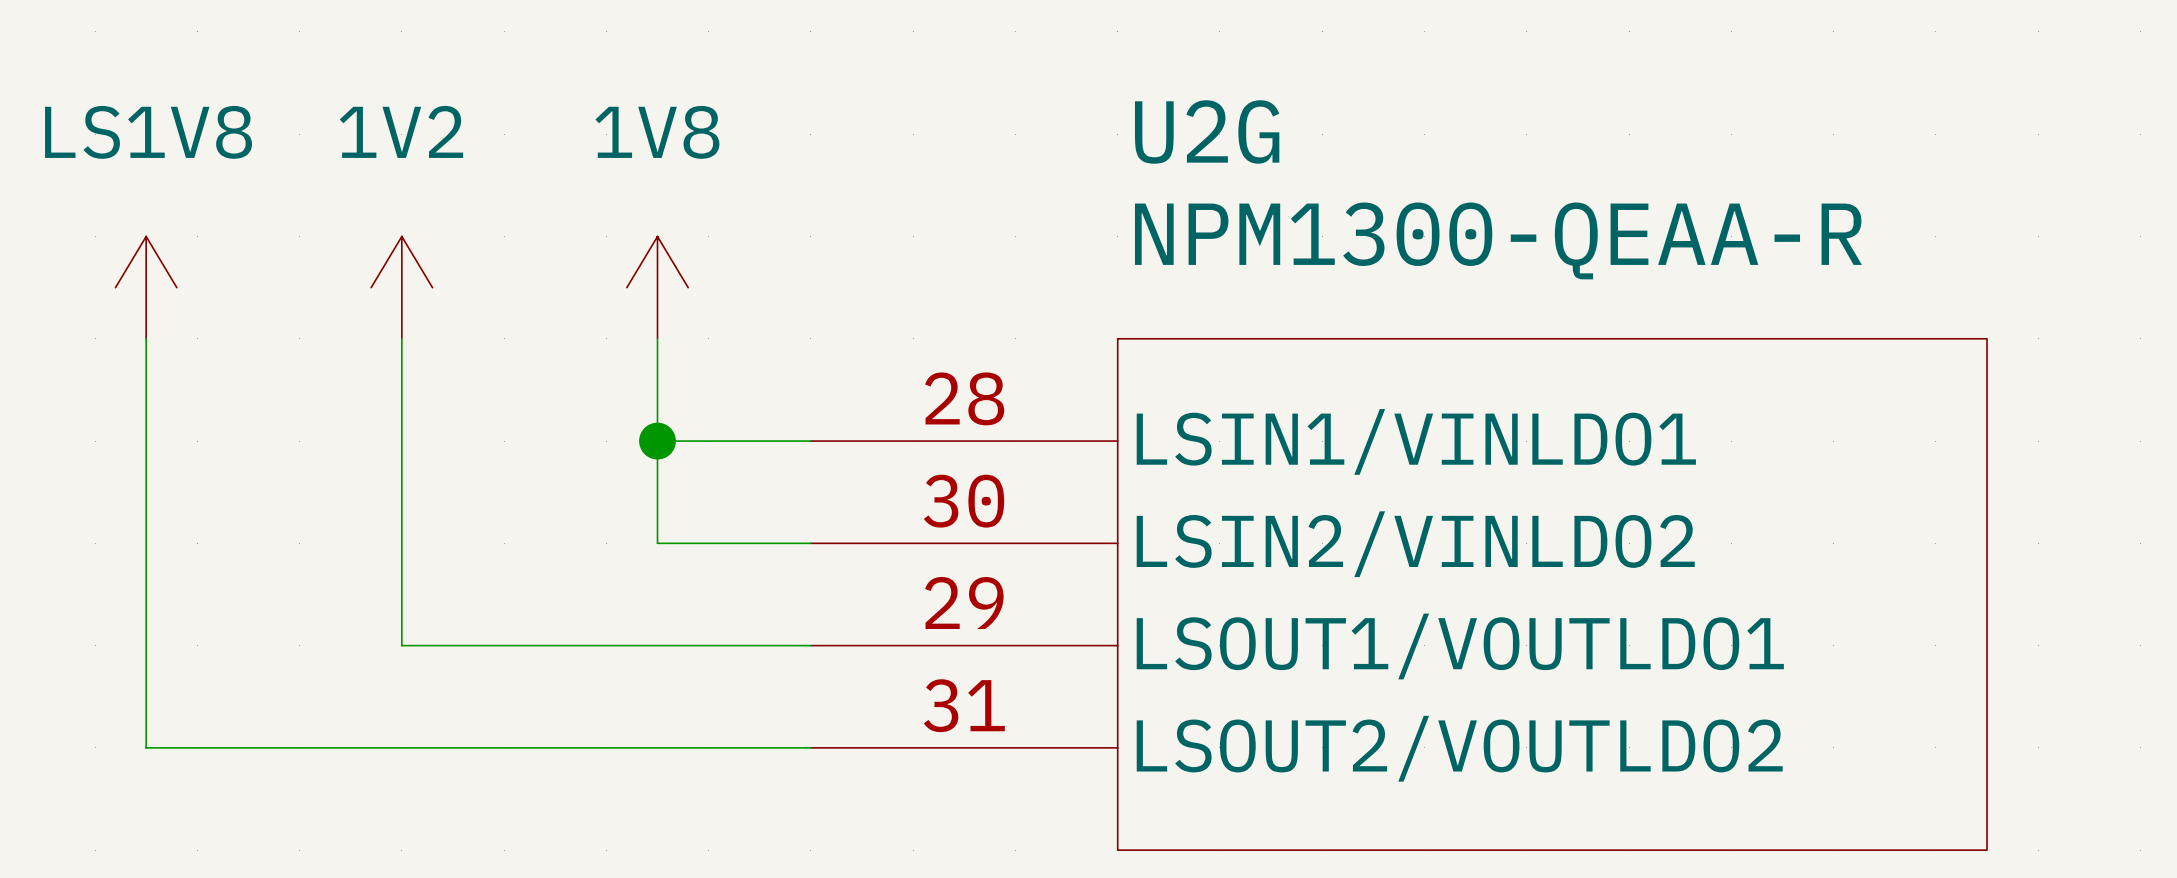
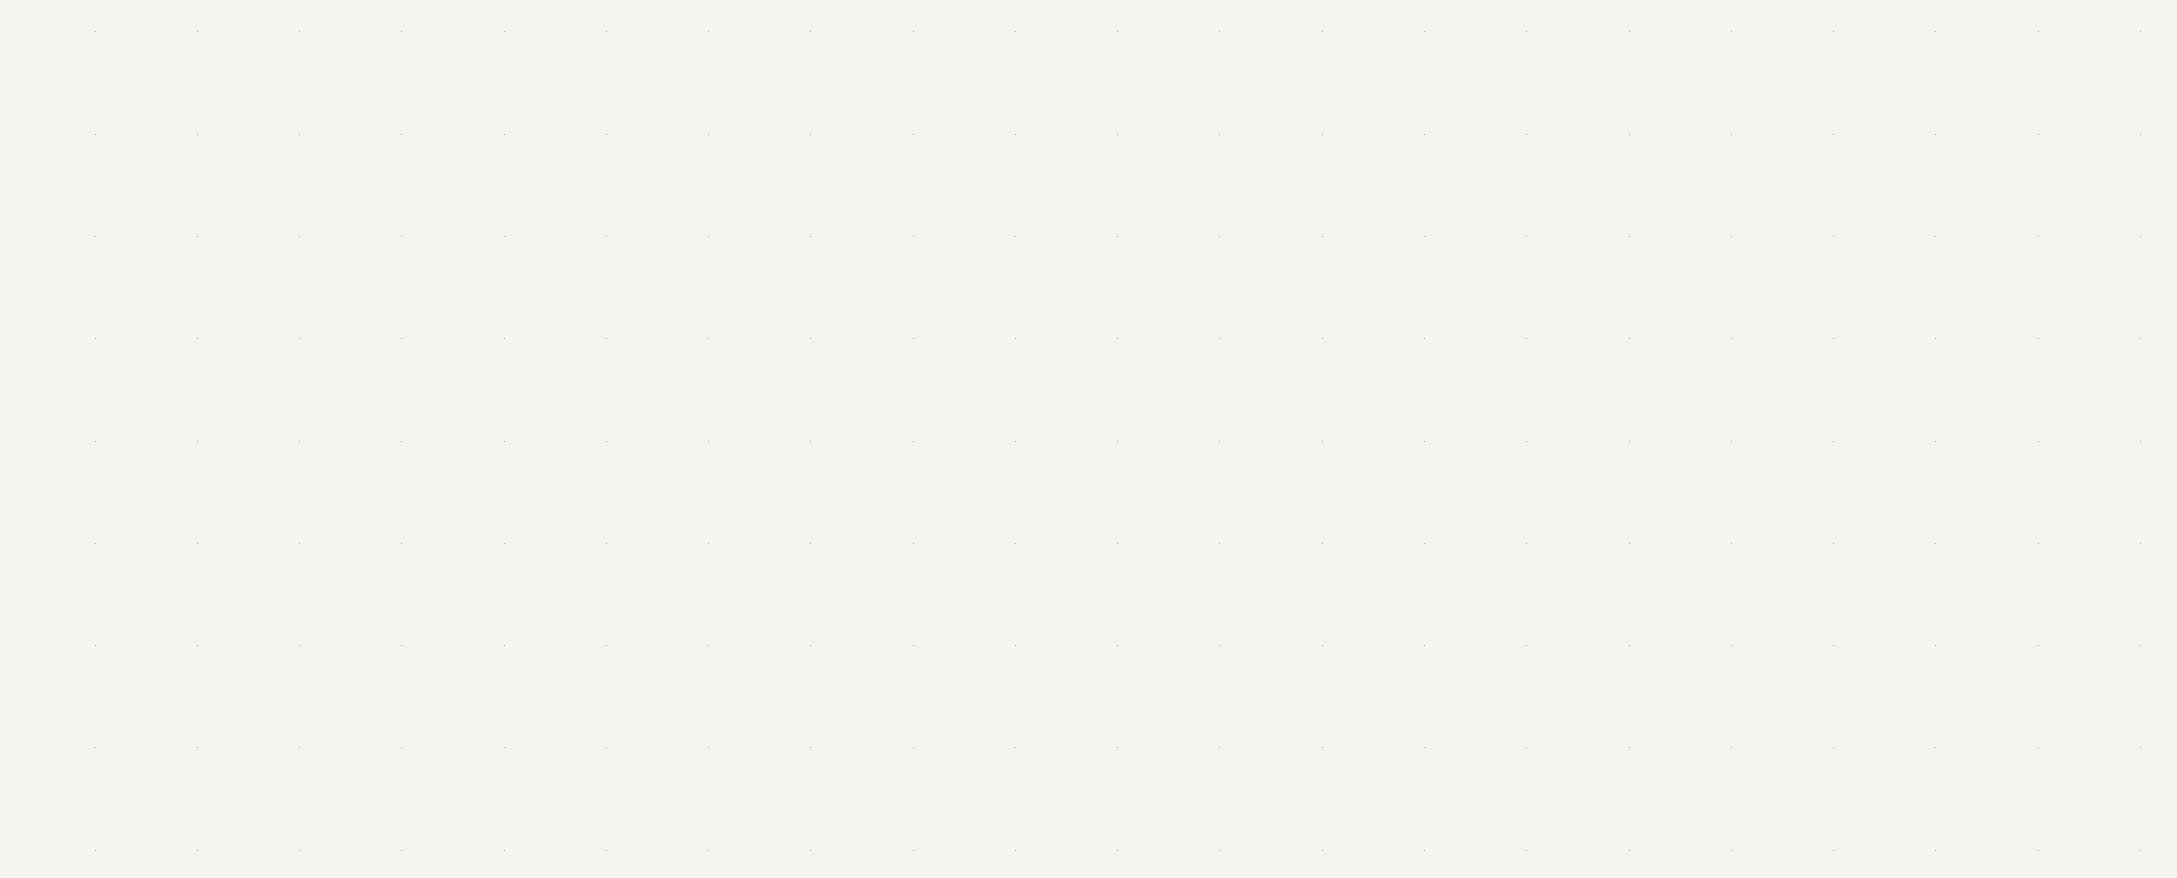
power symbol: LS1V8 (146, 287) -> none
power symbol: 1V2 (401, 287) -> none
power symbol: 1V8 (657, 287) -> none
wire: (146, 338) (146, 747) (810, 747) -> none
wire: (401, 338) (401, 645) (810, 645) -> none
wire: (657, 338) (657, 543) (810, 543) -> none
wire: (657, 441) (810, 441) -> none
junction: (657, 441) -> none
U2G: NPM1300-QEAA-R (1398, 594) -> none

